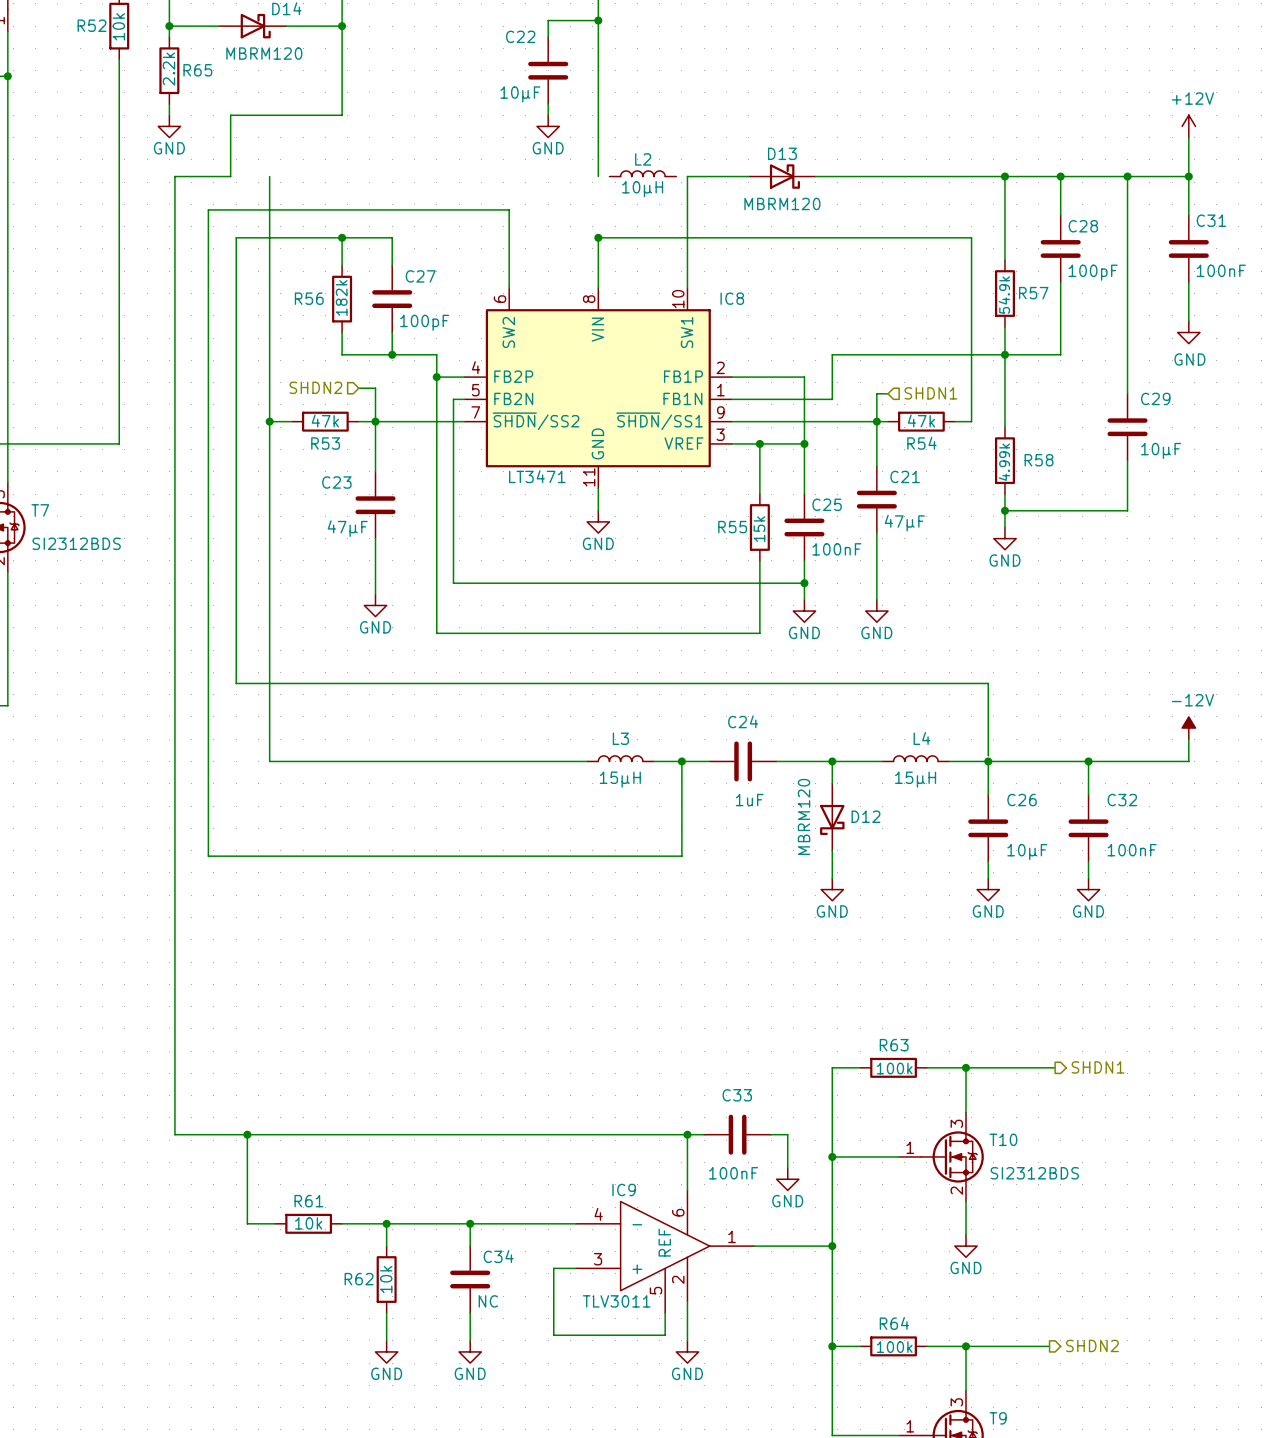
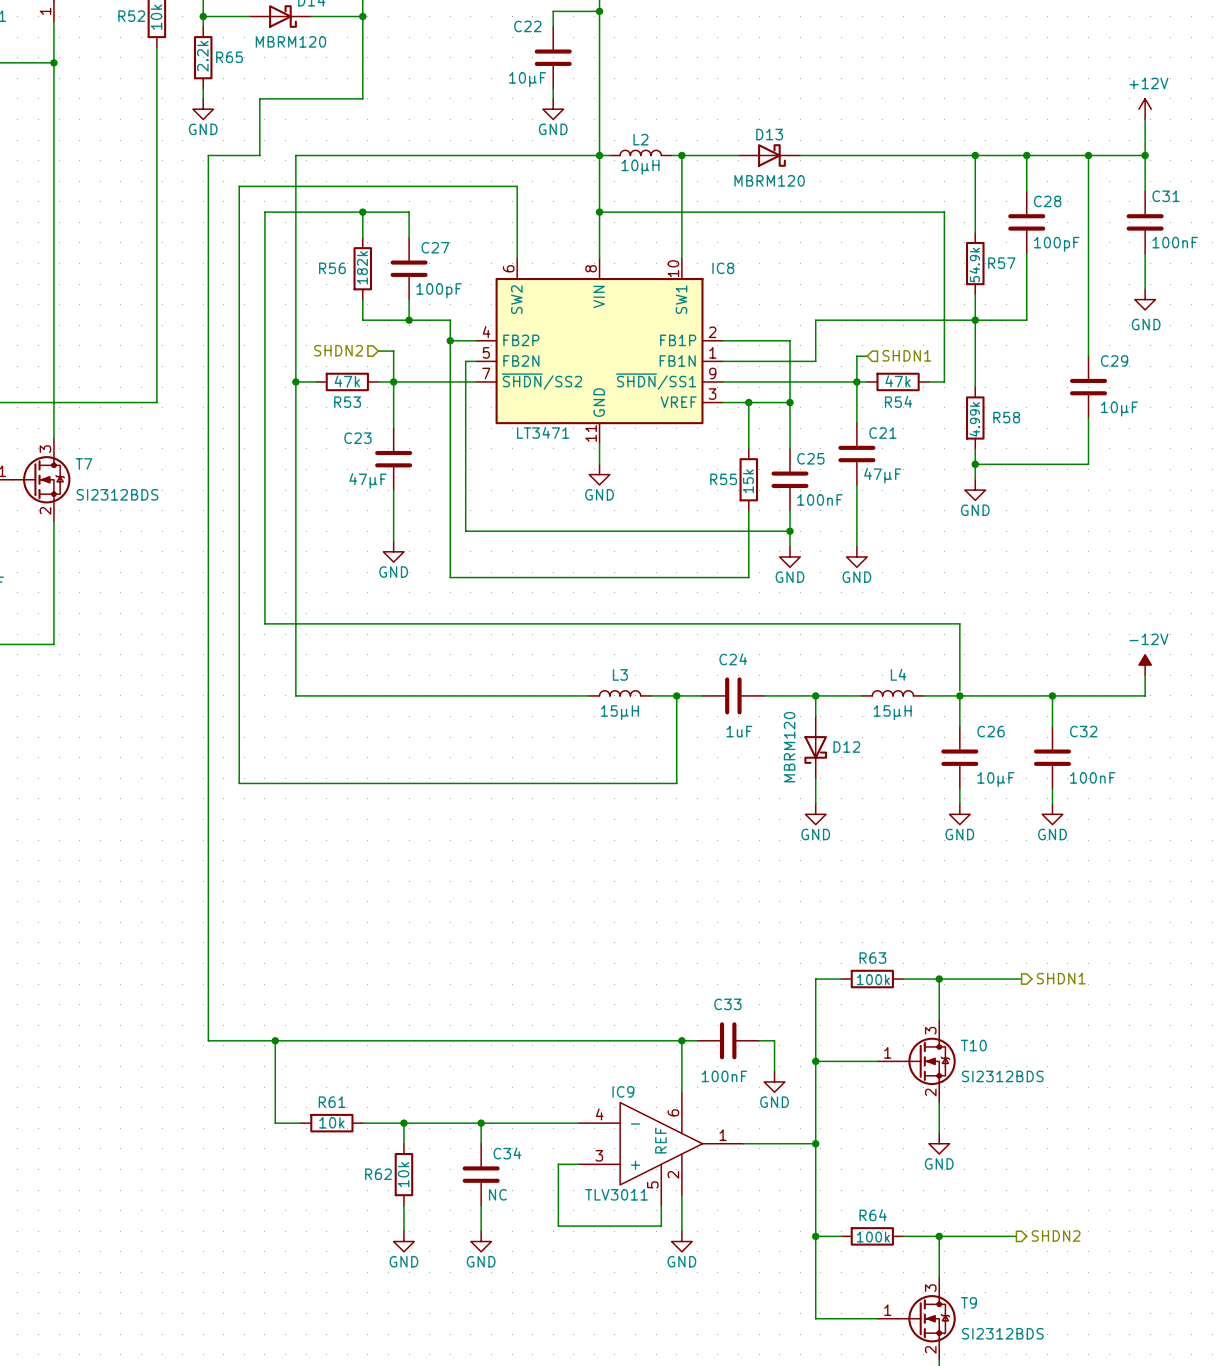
wire: none -> (295, 155) (609, 155)
wire: none -> (599, 155) (599, 212)
junction: none -> (599, 155)
wire: none -> (671, 155) (681, 155)
junction: none -> (681, 155)

